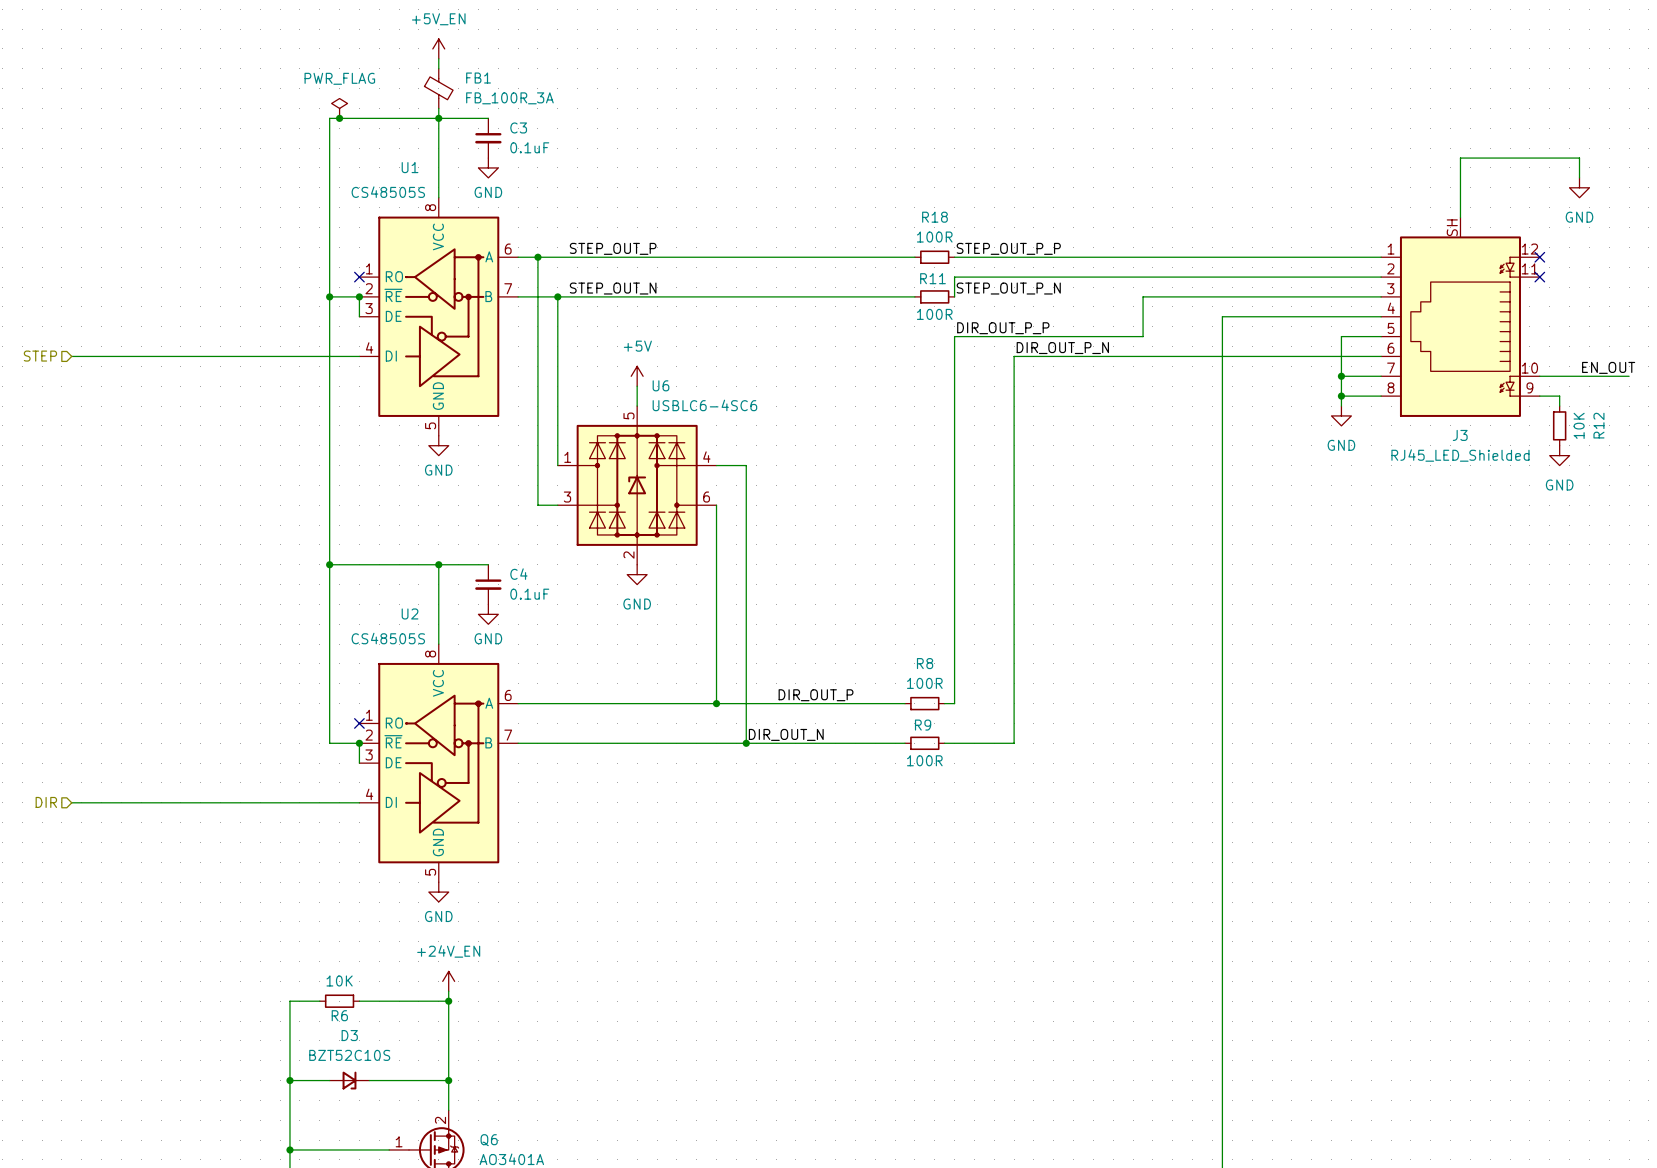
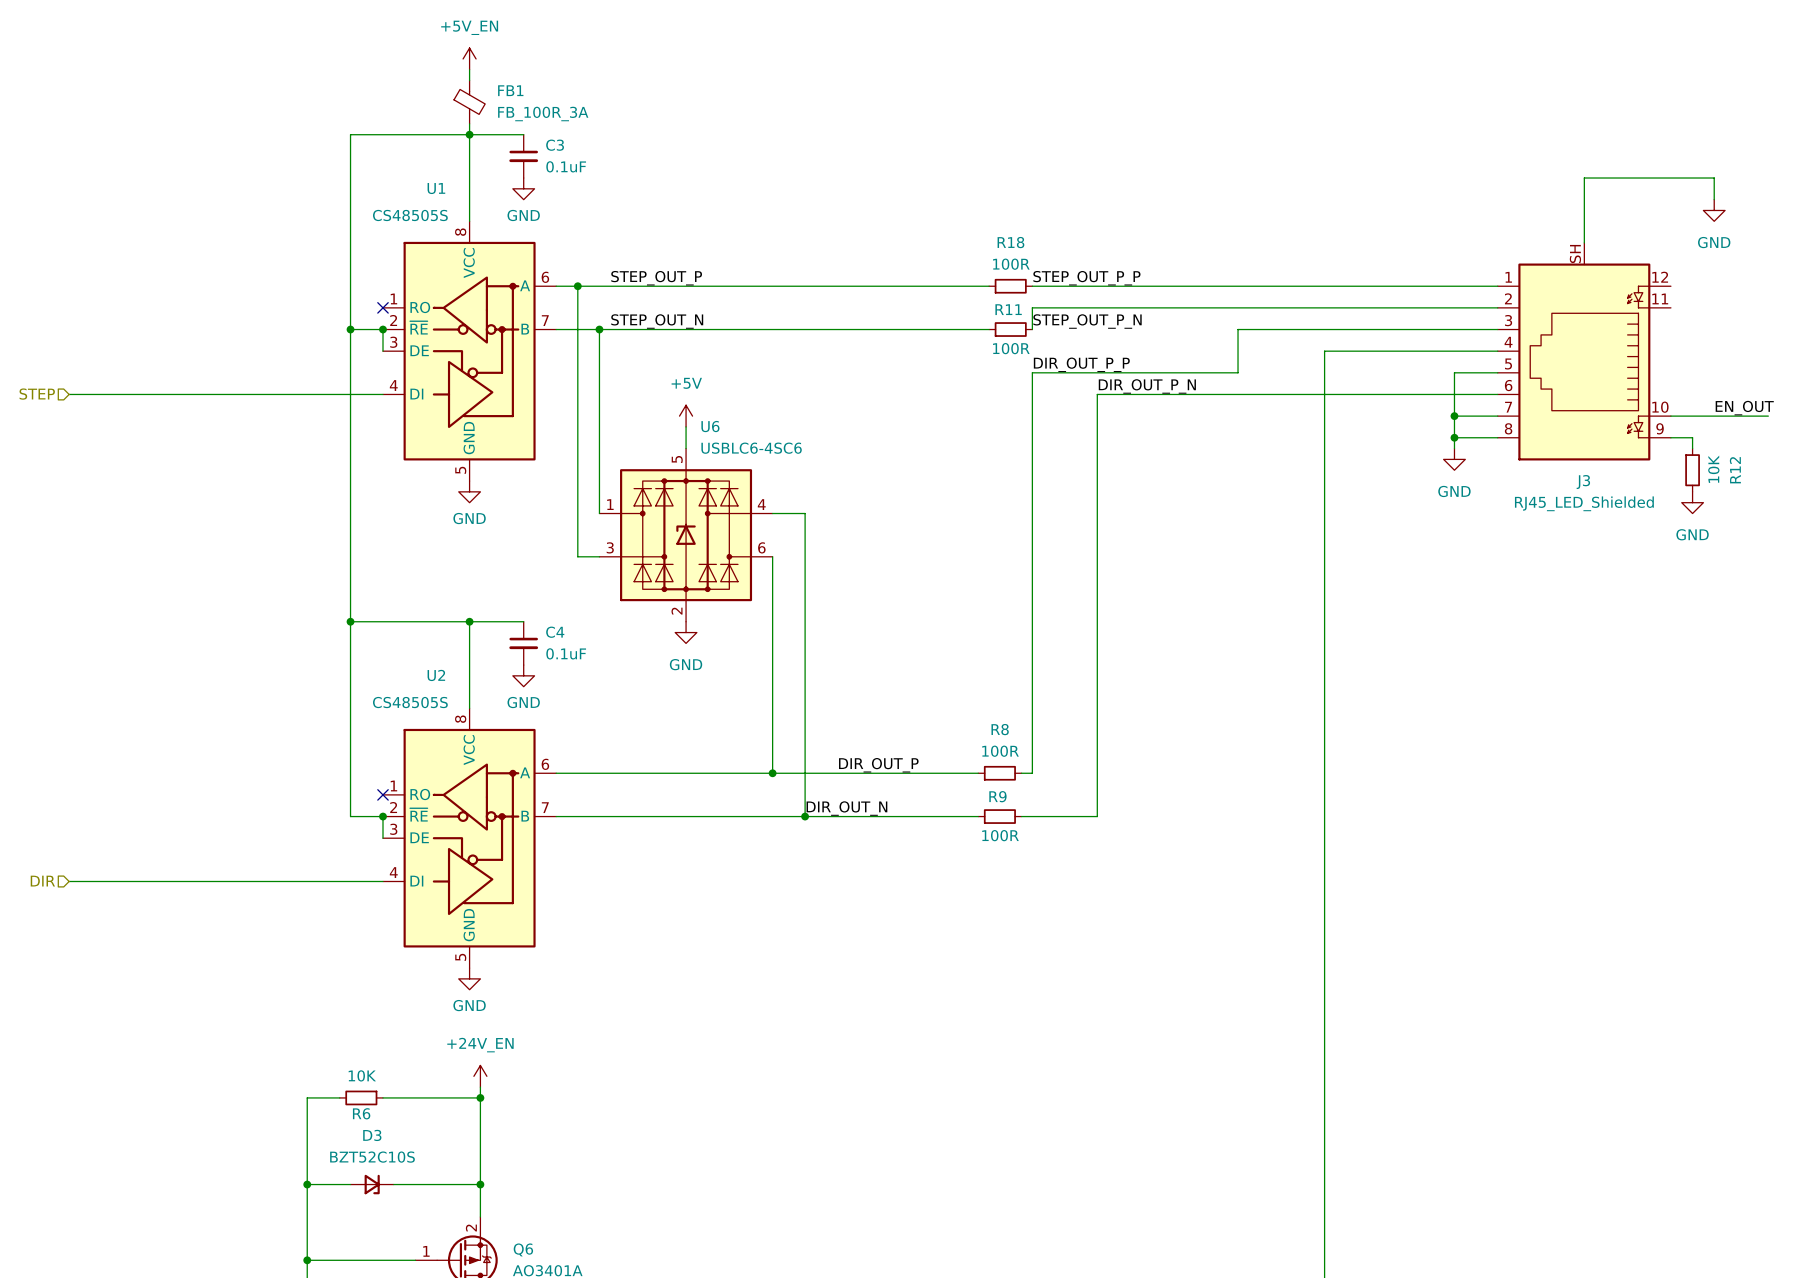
power symbol: PWR_FLAG (339, 108) -> none
junction: (339, 118) -> none
no-connect mark: (1539, 257) -> none
no-connect mark: (1539, 277) -> none

